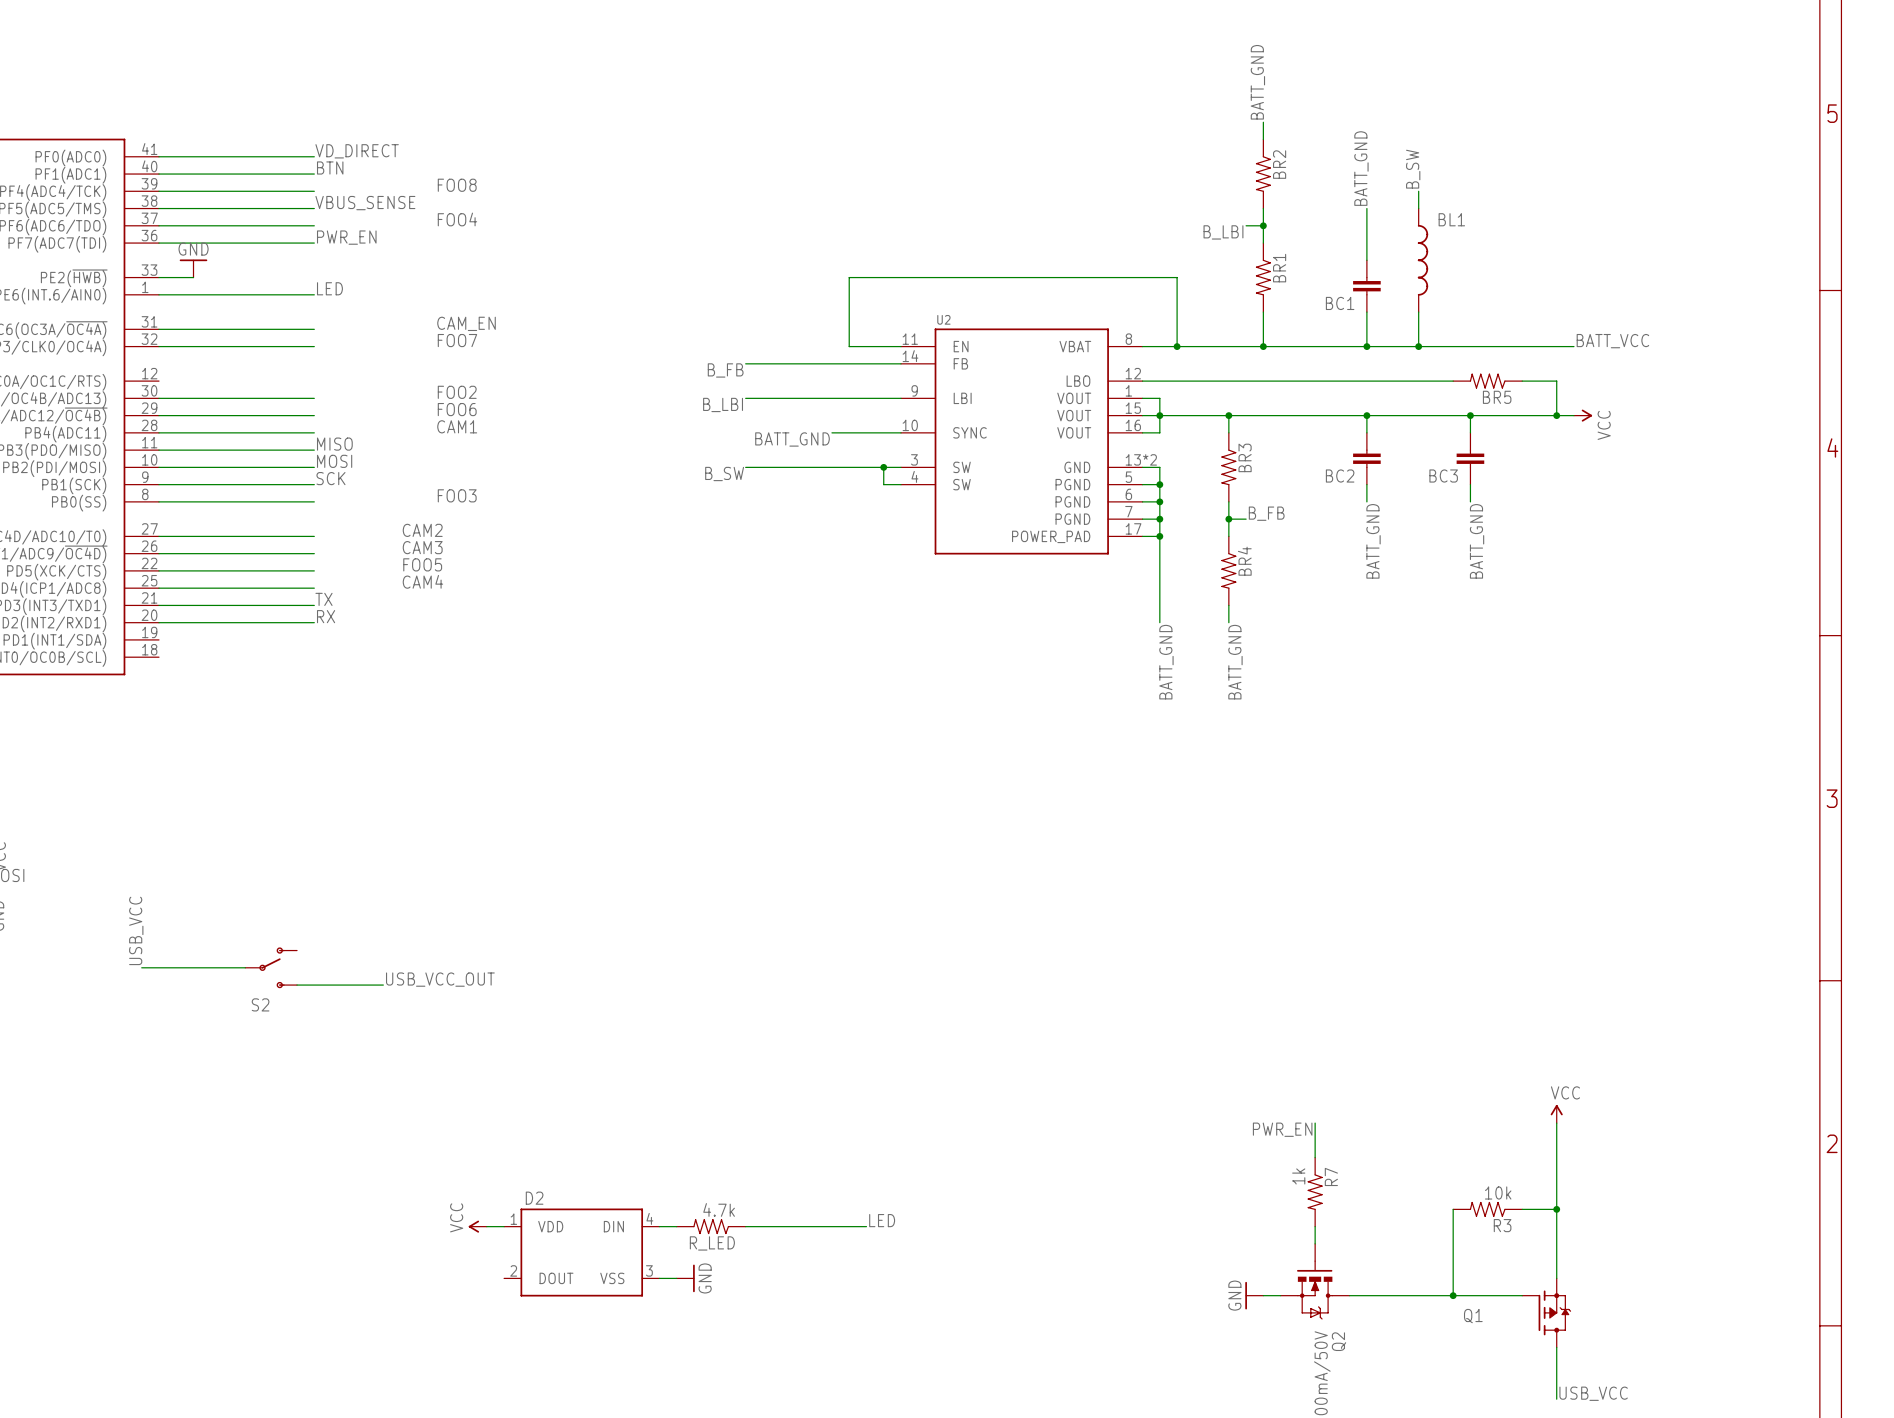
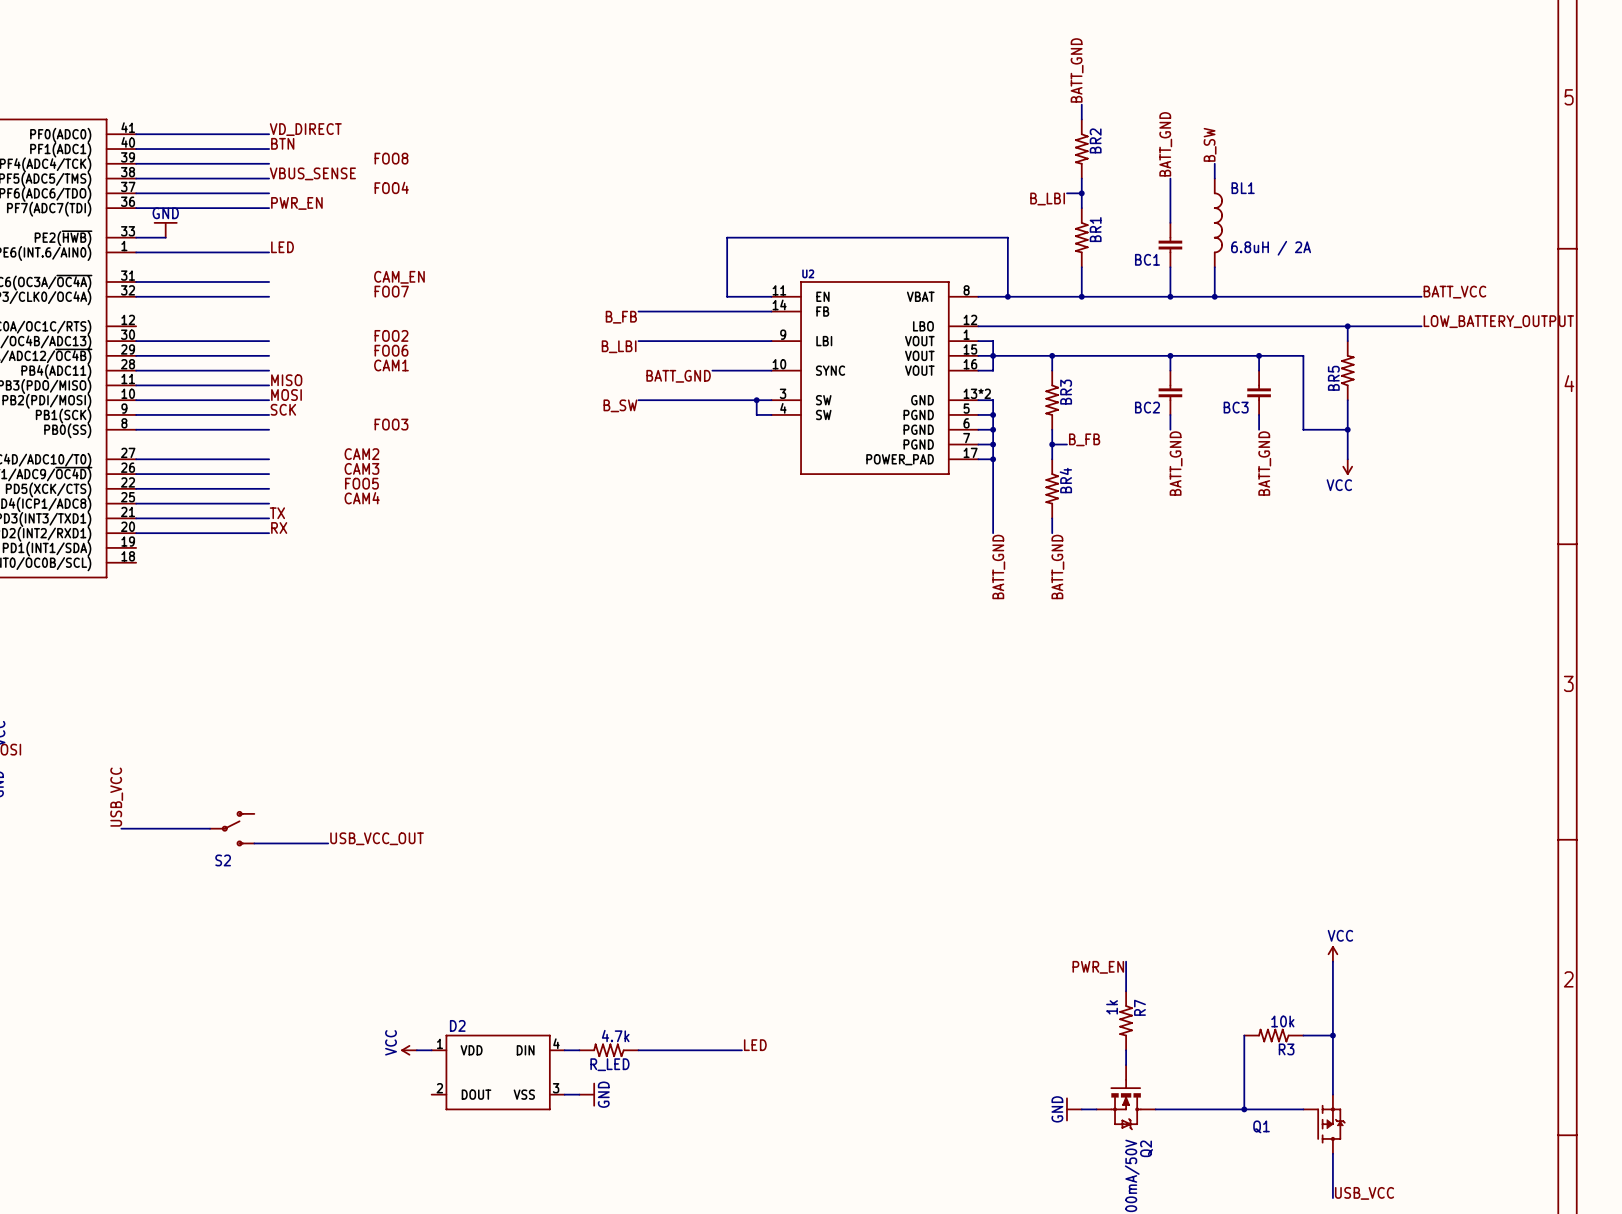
BL1 value: none -> 6.8uH / 2A (1271, 248)
label position: BATT_VCC (1612, 341) -> BATT_VCC (1454, 292)
wire: none -> (1347, 296) (1421, 296)
label: none -> LOW_BATTERY_OUTPUT (1498, 321)
BR5 rotation: 0° (1487, 381) -> 90° clockwise (1347, 370)
BR5 position: (1487, 381) -> (1347, 370)
wire: (1556, 381) (1556, 415) -> (1332, 326) (1421, 326)
wire: none -> (1347, 326) (1347, 341)
wire: (1522, 415) (1573, 415) -> (1303, 355) (1303, 429) (1347, 429)
junction position: (1556, 415) -> (1347, 326)
power symbol position: VCC (1583, 415) -> VCC (1347, 467)
power symbol rotation: 0° (1586, 415) -> 90° clockwise (1347, 470)
wire: none -> (1347, 400) (1347, 459)
junction: none -> (1347, 429)

